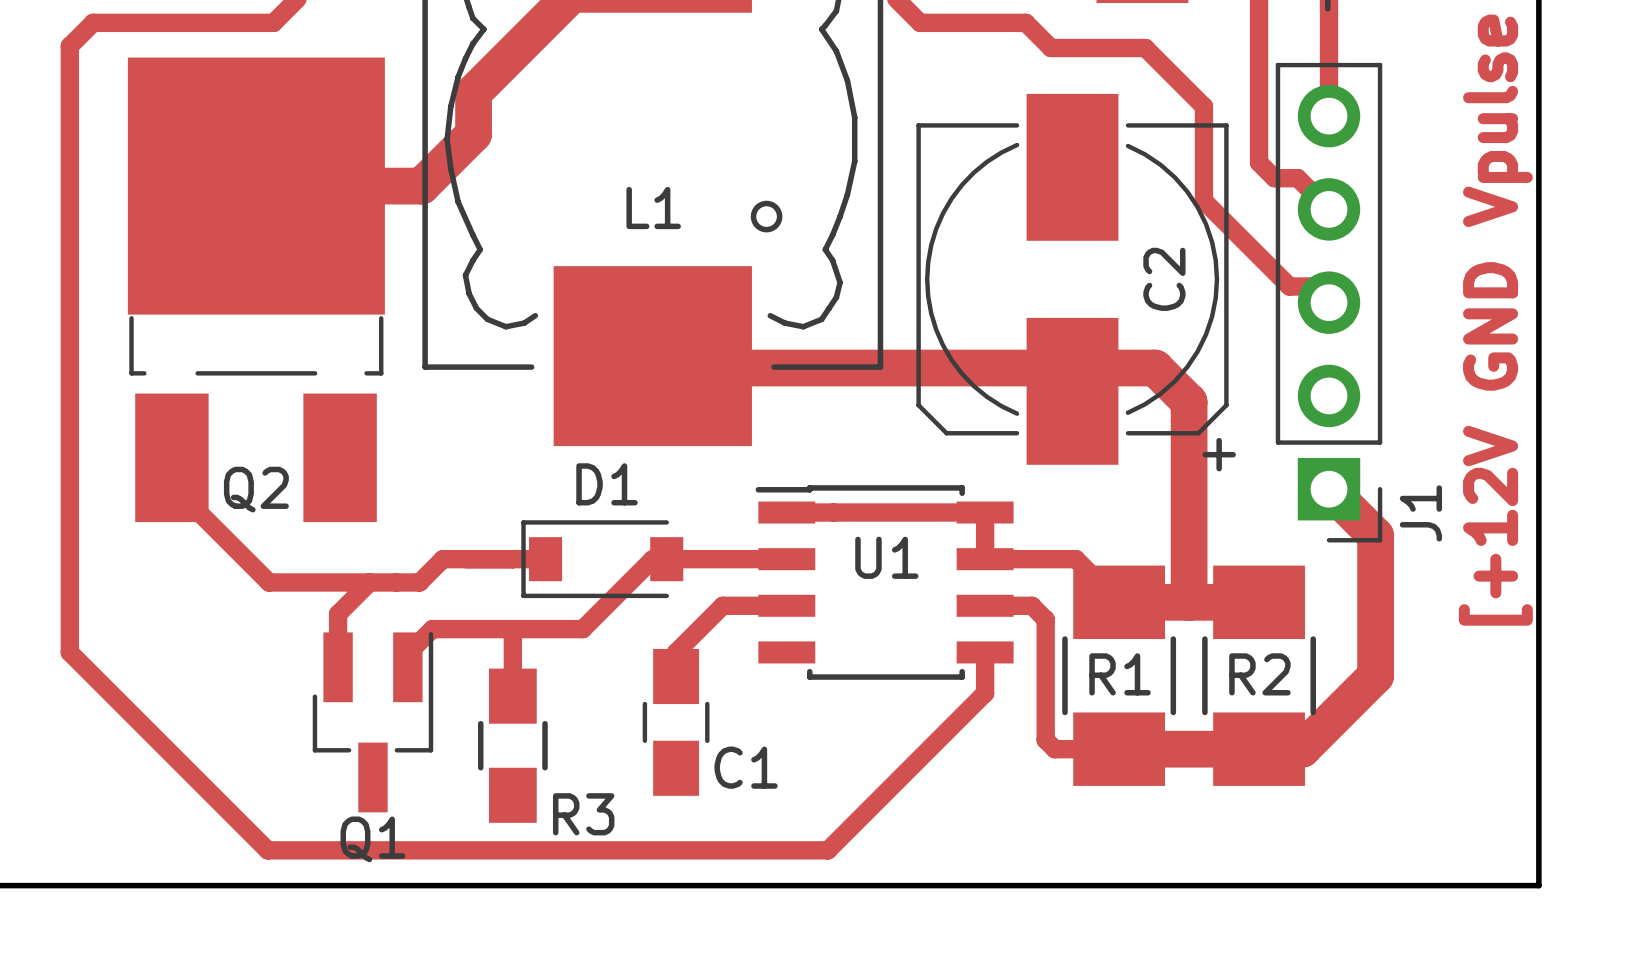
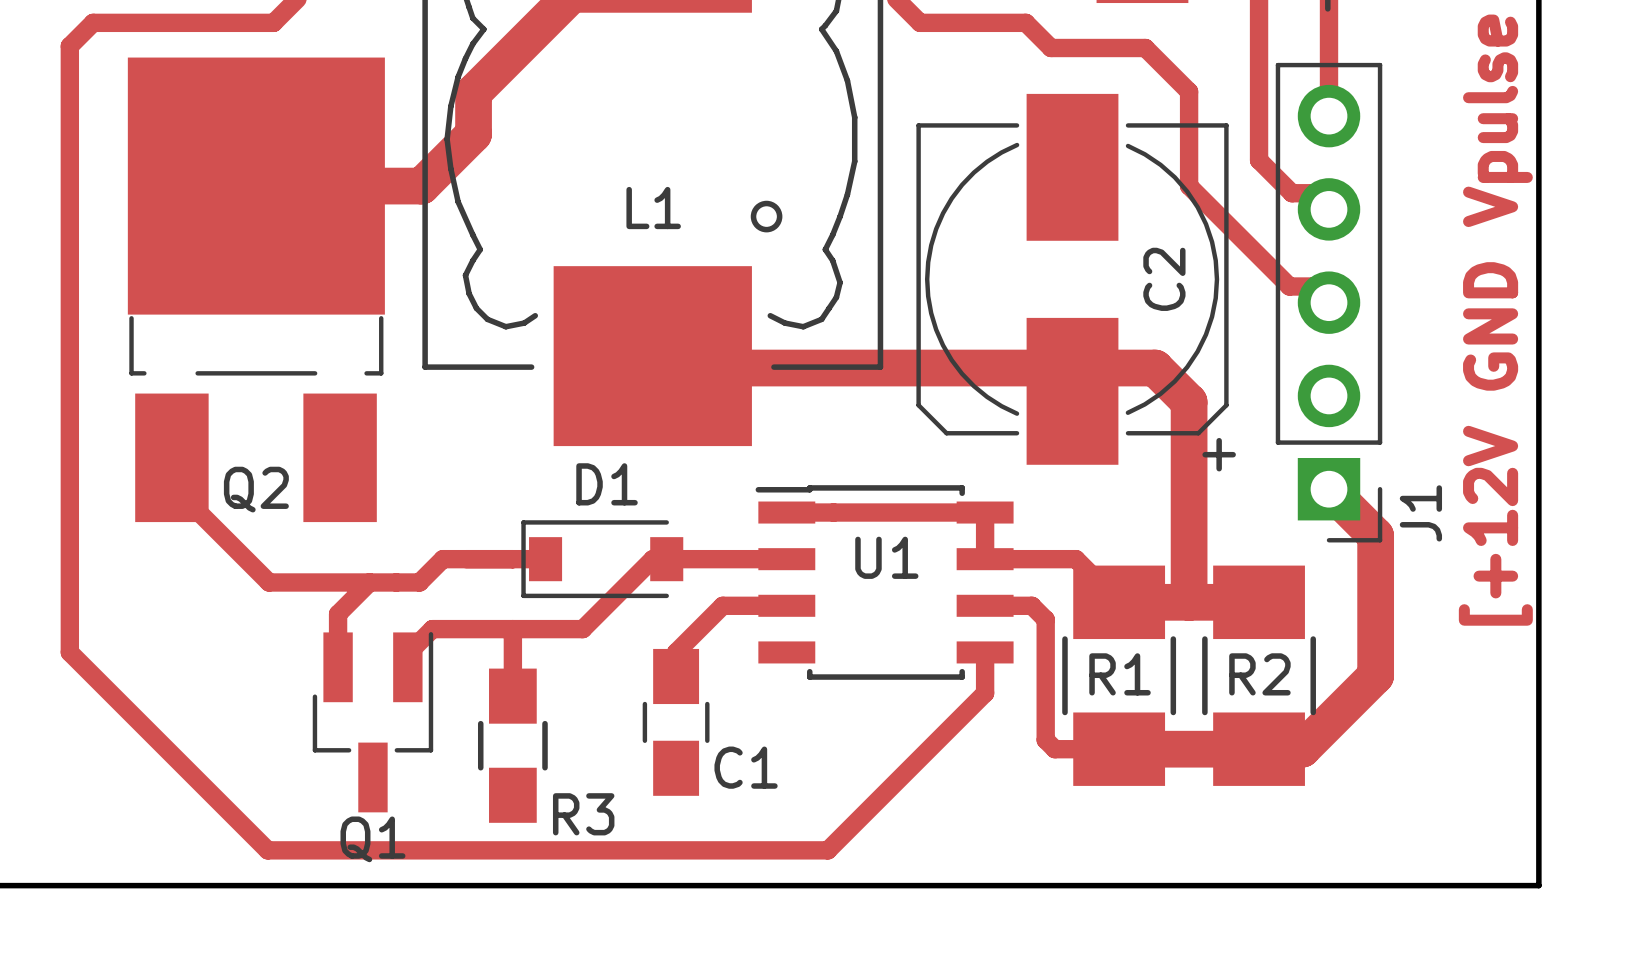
track: (1189, 91) (1203, 106) (1203, 200) -> (1189, 91) (1189, 186) (1203, 200)
track: (1259, 160) (1259, 162) (1274, 178) (1297, 178) (1312, 193) -> (1259, 160) (1291, 193) (1312, 193)

